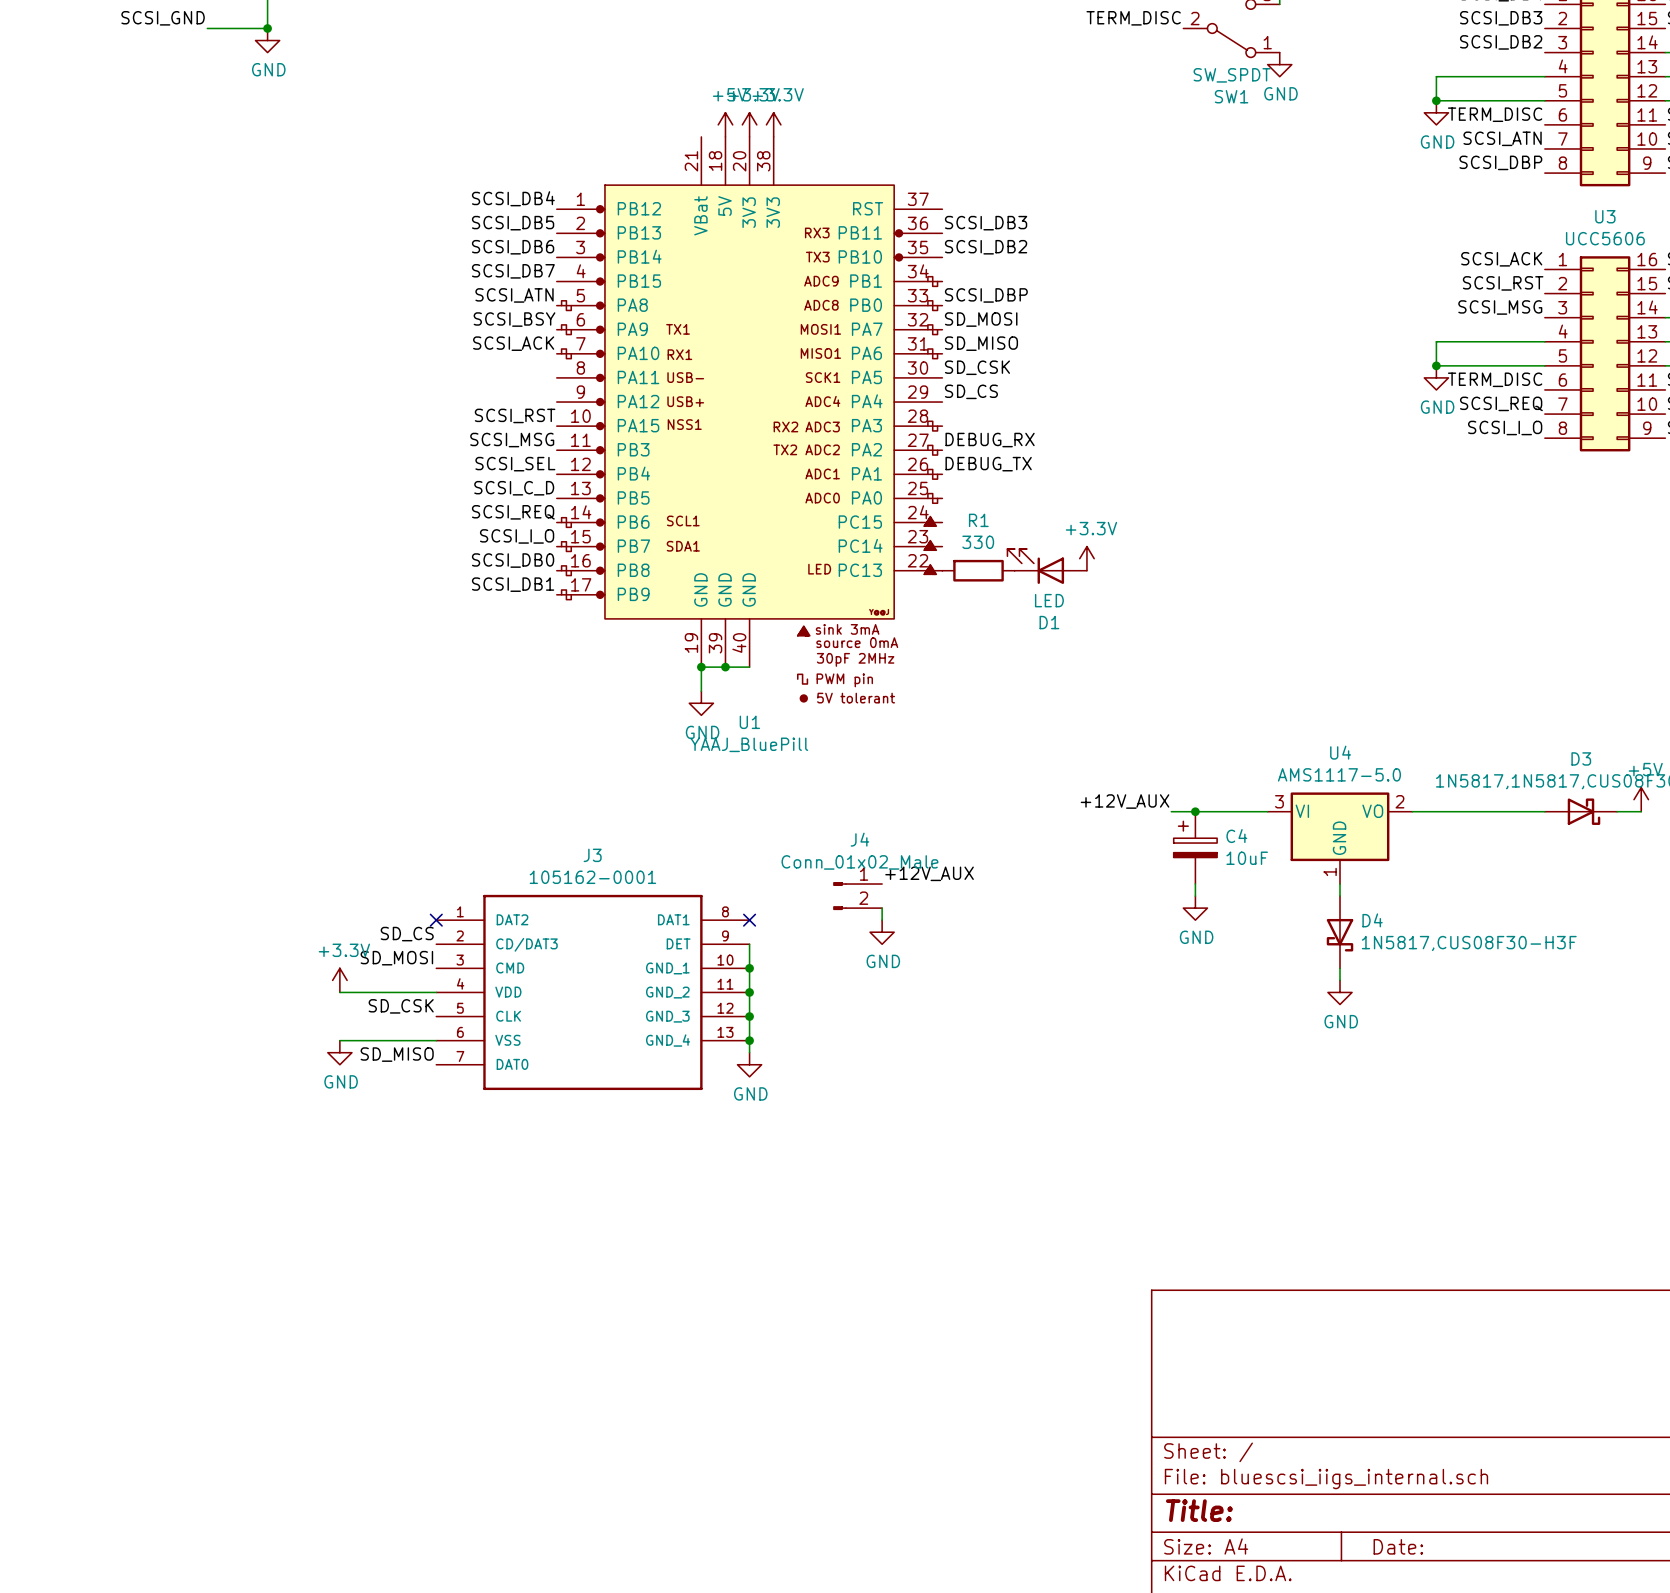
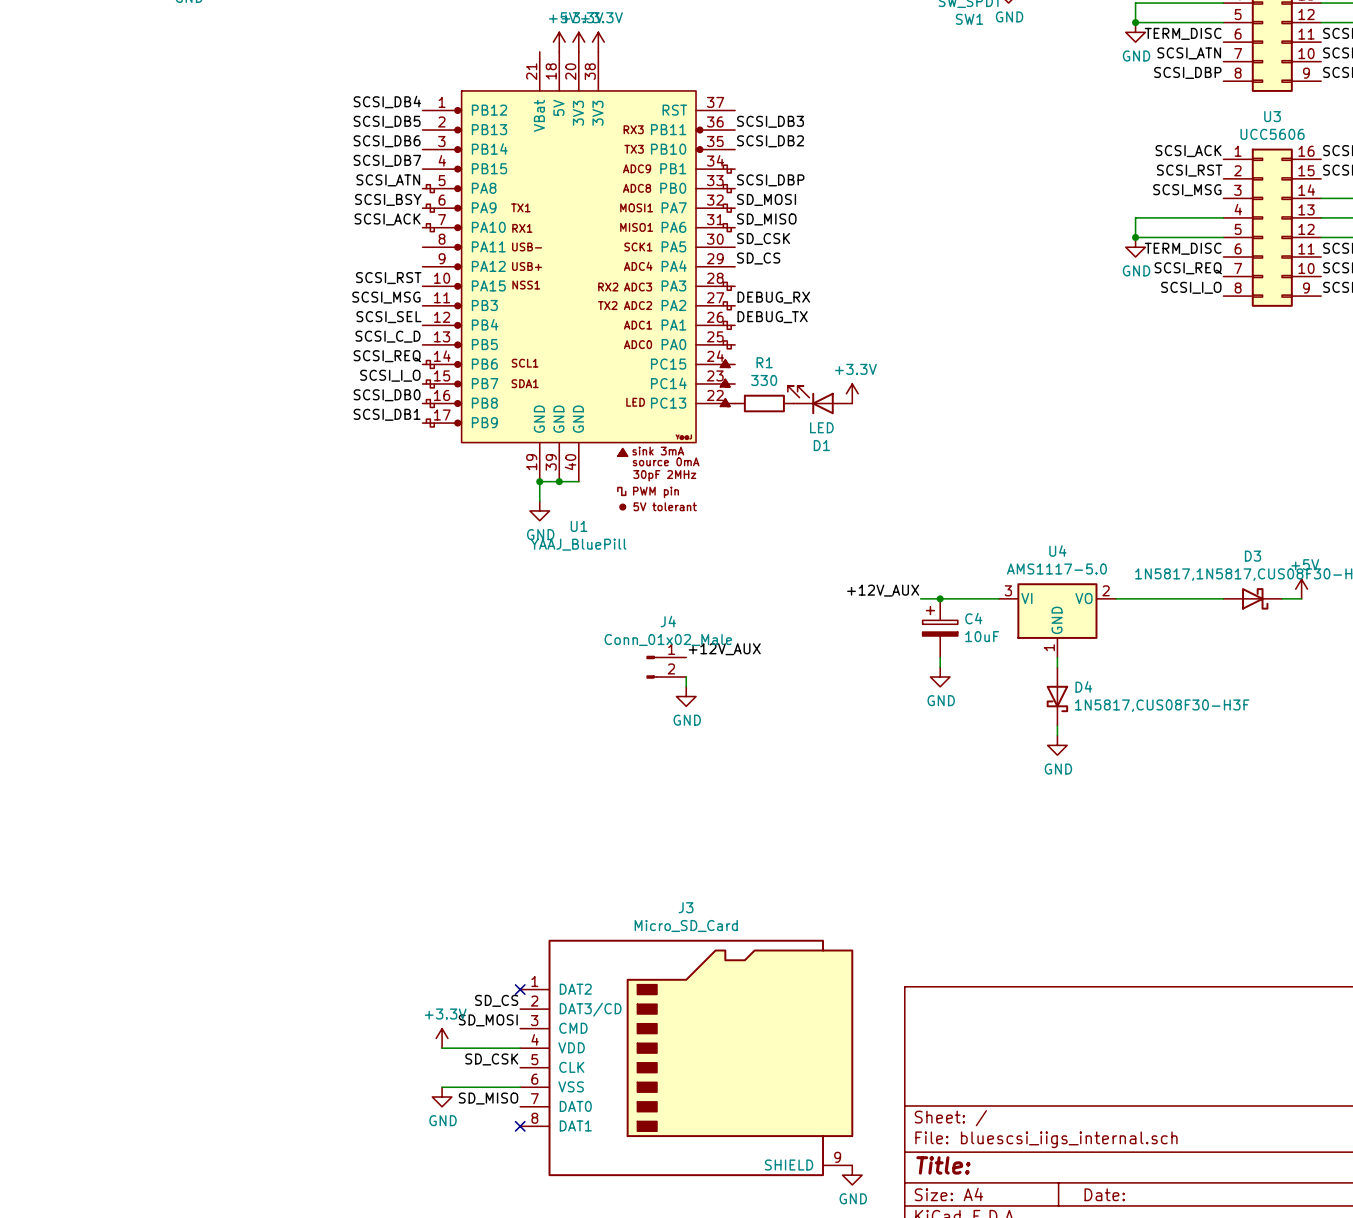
J3 name position: J3 (592, 855) -> J3 (686, 907)
J3 value: 105162-0001 (592, 877) -> Micro_SD_Card (686, 925)
J3 symbol: [436, 894, 750, 1091] -> [520, 939, 854, 1177]
no-connect mark: (436, 920) -> none
no-connect mark: (749, 920) -> none
label: SD_CS (407, 934) -> none
wire: (749, 944) (749, 1052) -> none
label: SD_MOSI (396, 958) -> none
junction: (749, 968) -> none
power symbol: +3.3V (339, 980) -> none
wire: (339, 992) (436, 992) -> none
junction: (749, 992) -> none
label: SD_CSK (401, 1006) -> none
junction: (749, 1016) -> none
wire: (339, 1040) (436, 1040) -> none
junction: (749, 1040) -> none
power symbol: GND (339, 1052) -> none
label: SD_MISO (397, 1054) -> none
power symbol: GND (749, 1064) -> none
no-connect mark: none -> (520, 989)
label: none -> SD_CS (496, 1000)
label: none -> SD_MOSI (488, 1020)
power symbol: none -> +3.3V (442, 1038)
wire: none -> (442, 1048) (520, 1048)
label: none -> SD_CSK (491, 1059)
wire: none -> (442, 1087) (520, 1087)
power symbol: none -> GND (442, 1097)
label: none -> SD_MISO (488, 1098)
no-connect mark: none -> (520, 1126)
power symbol: none -> GND (852, 1175)

